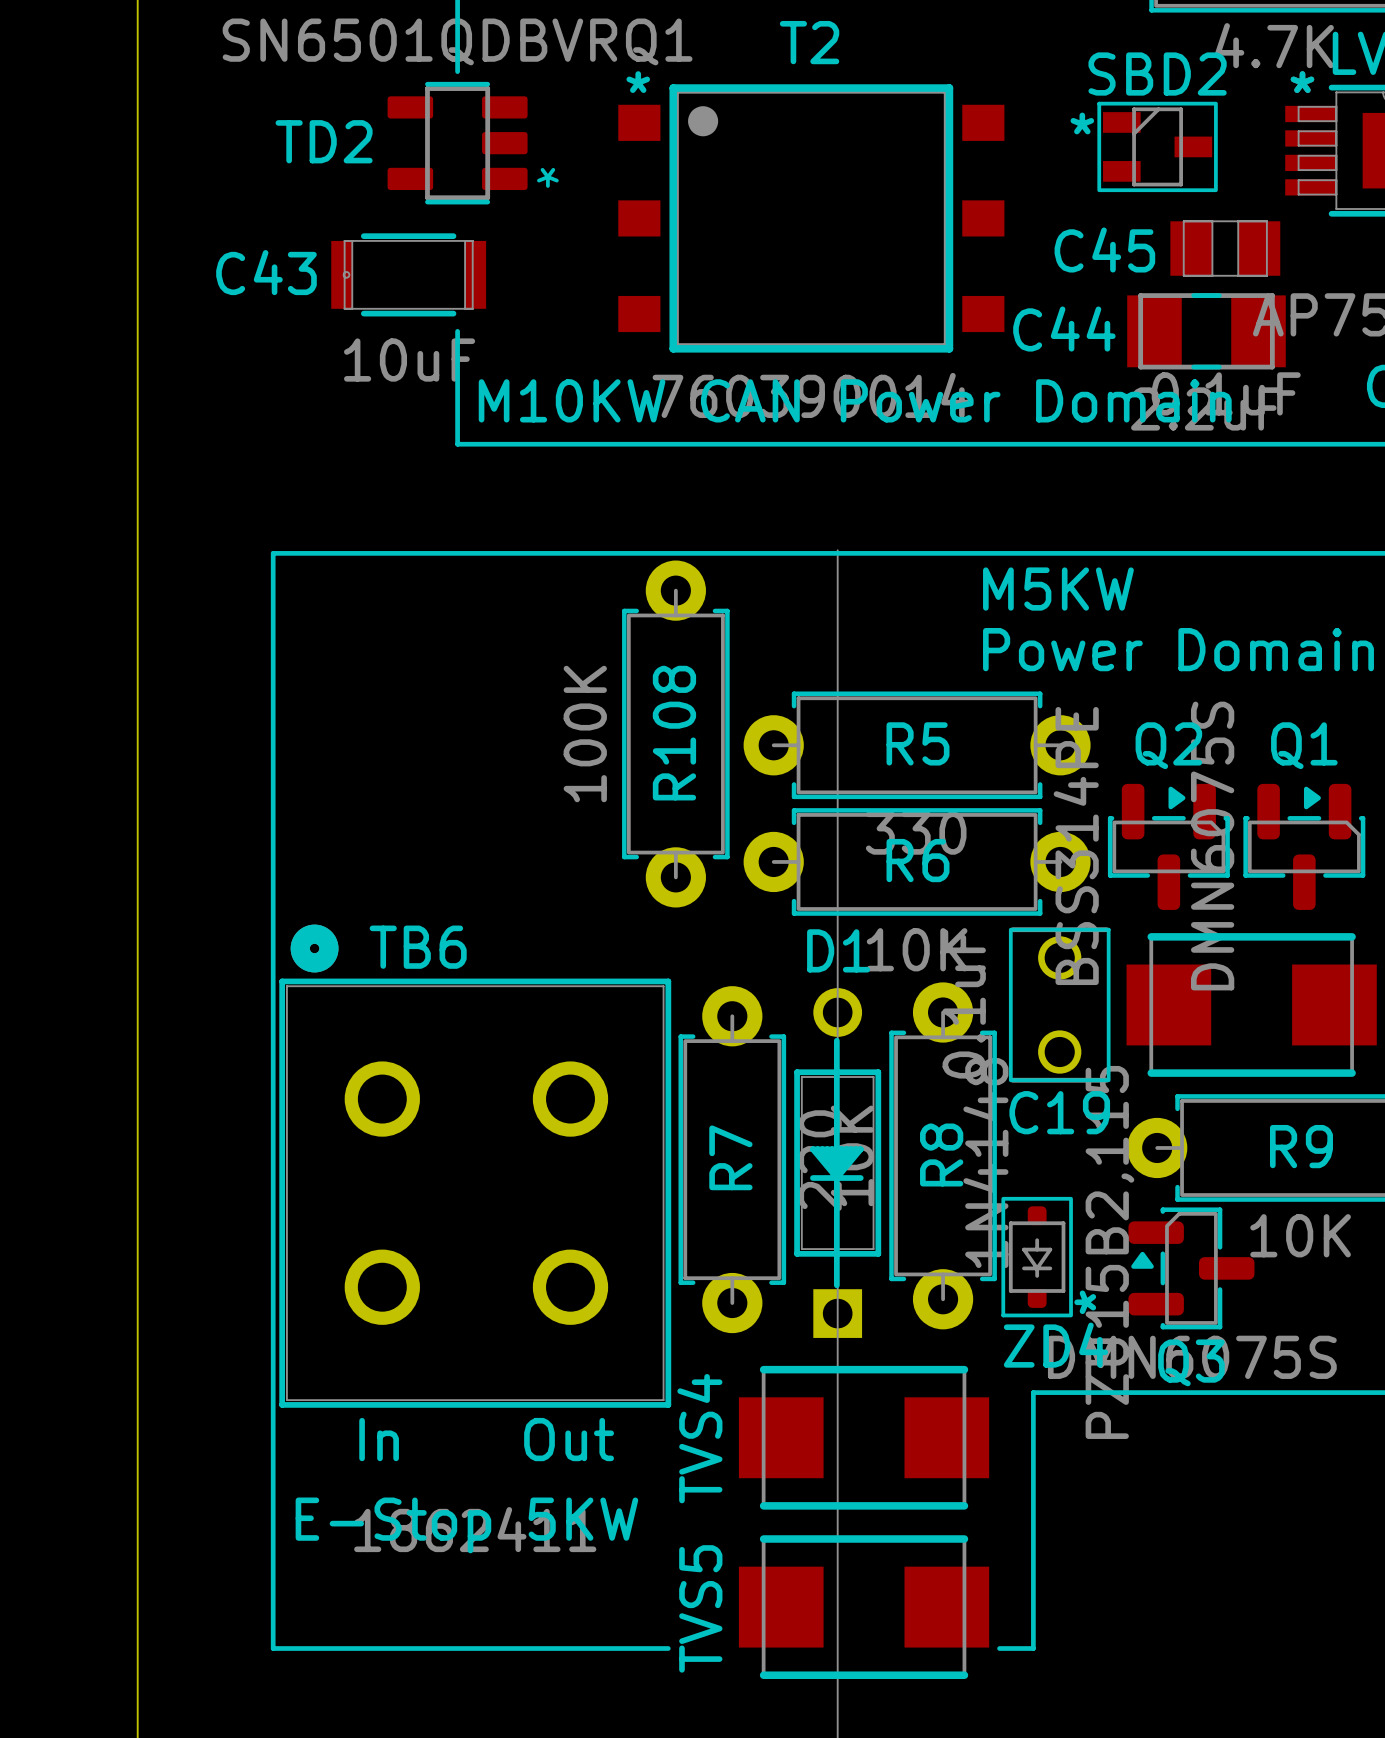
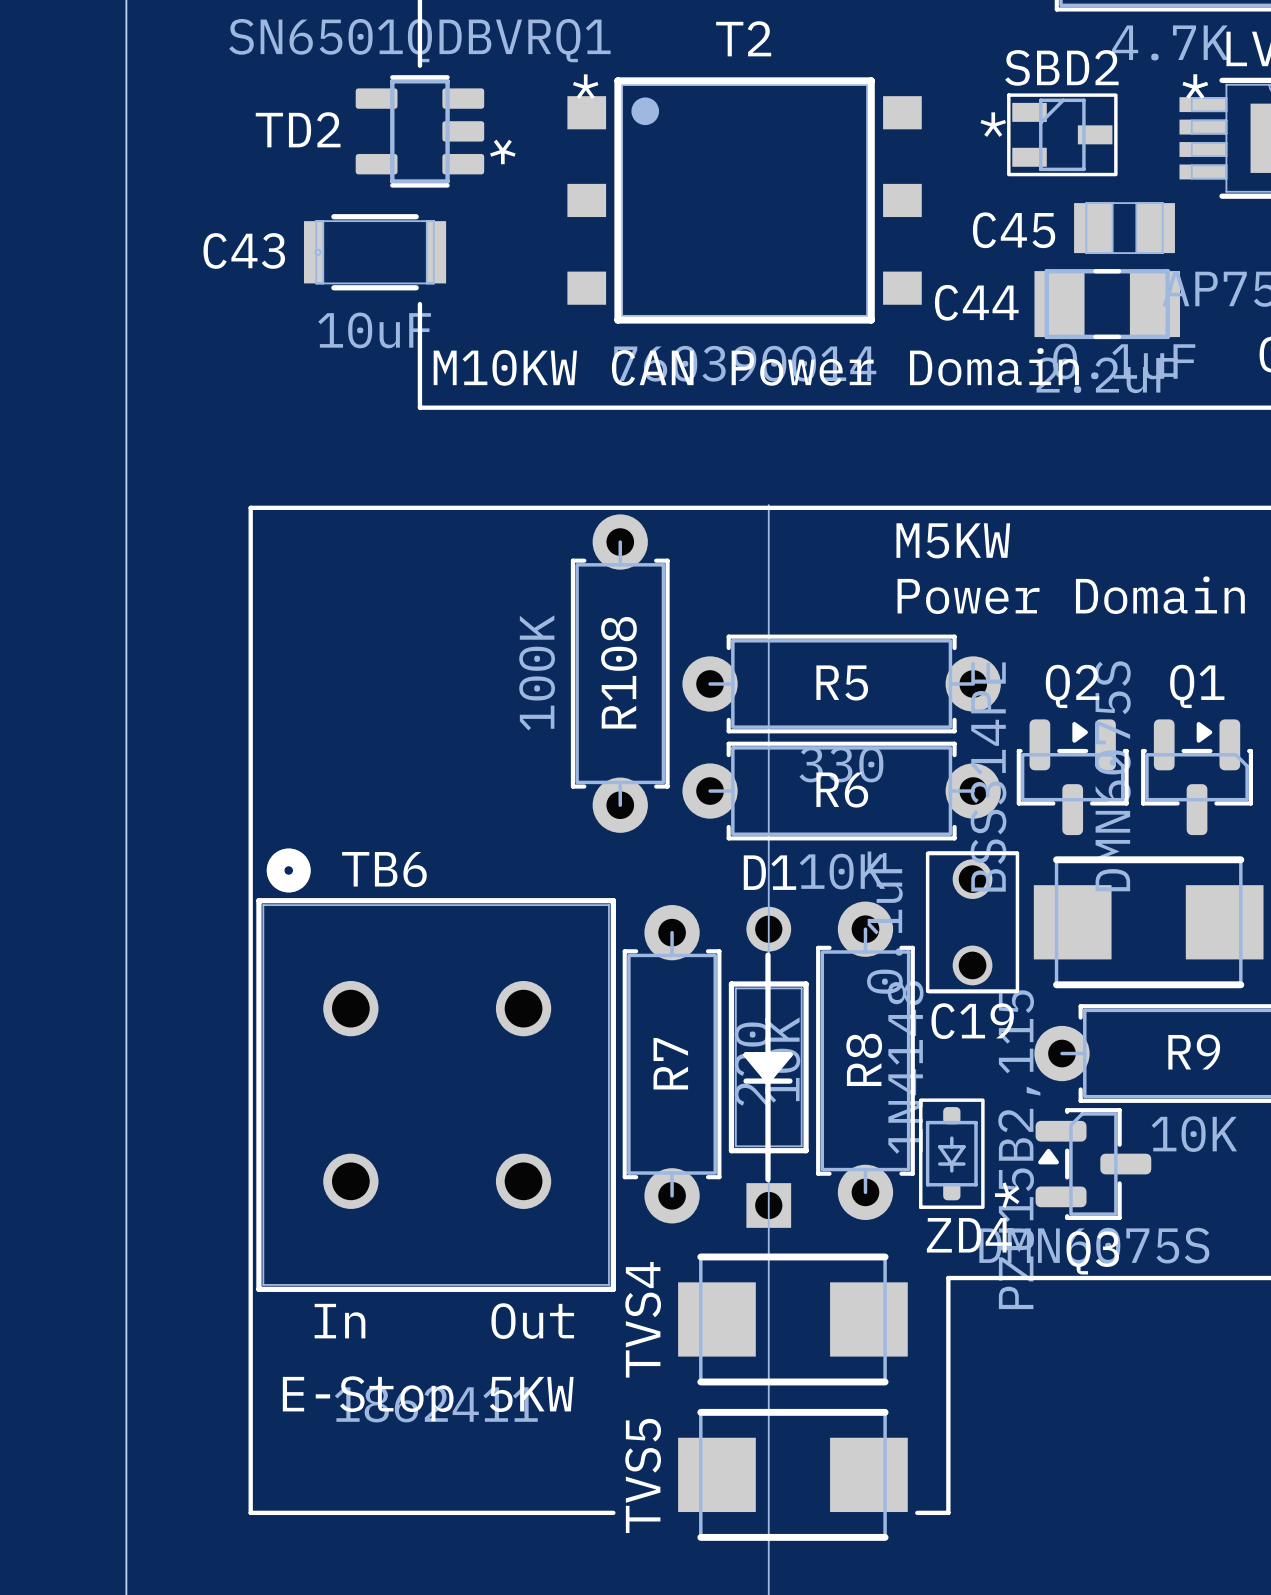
TB6 footprint: [279, 924, 672, 1408] -> [256, 848, 616, 1292]

